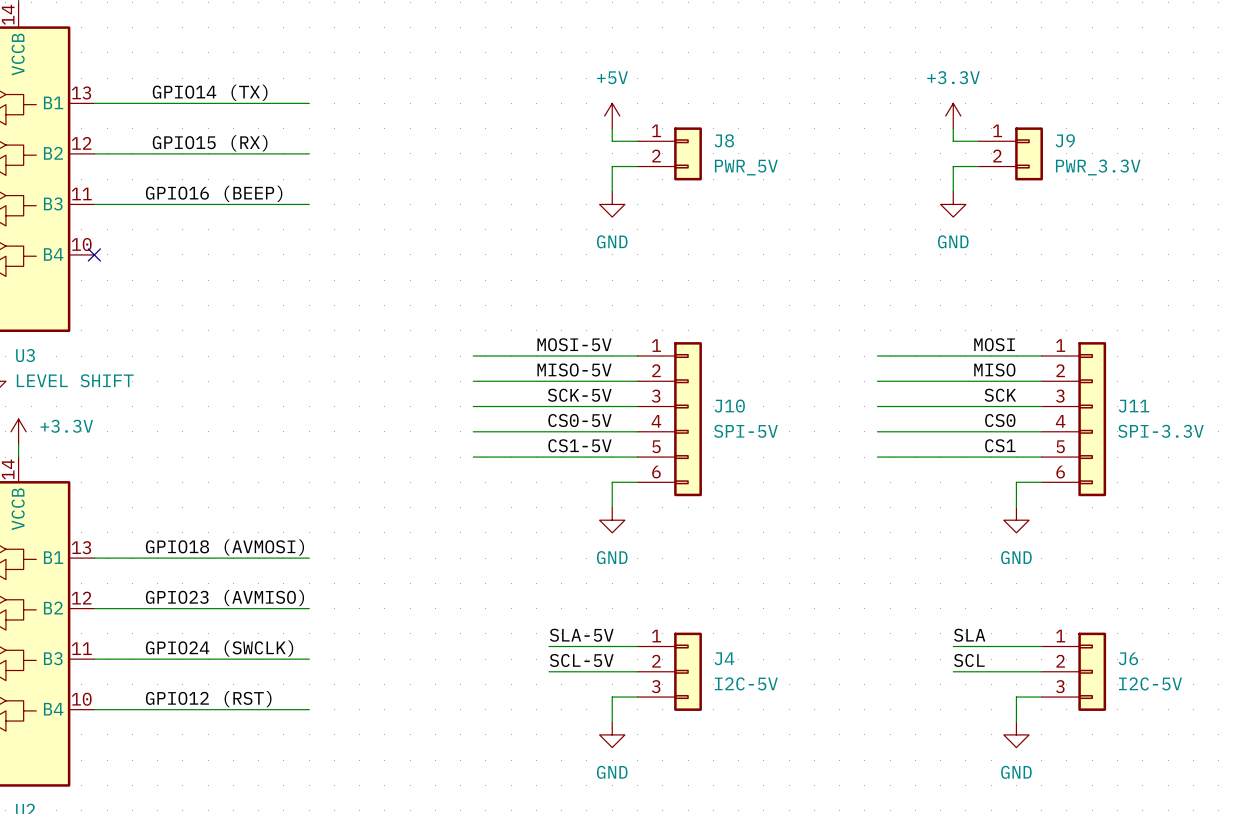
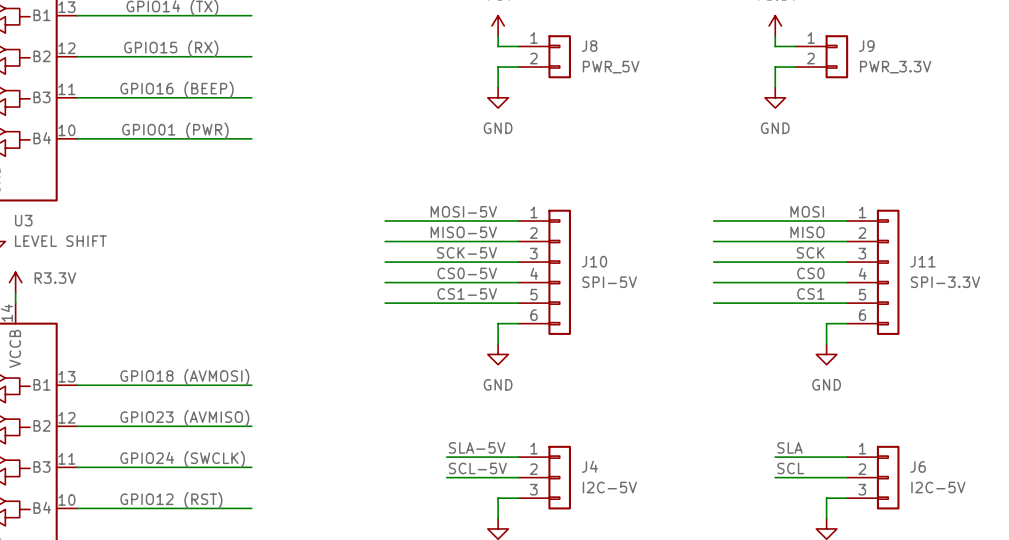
label: none -> GPIO01 (PWR) (175, 130)
wire: none -> (77, 138) (251, 138)
no-connect mark: (94, 254) -> none
power symbol: +3.3V (18, 431) -> R3.3V (15, 282)

